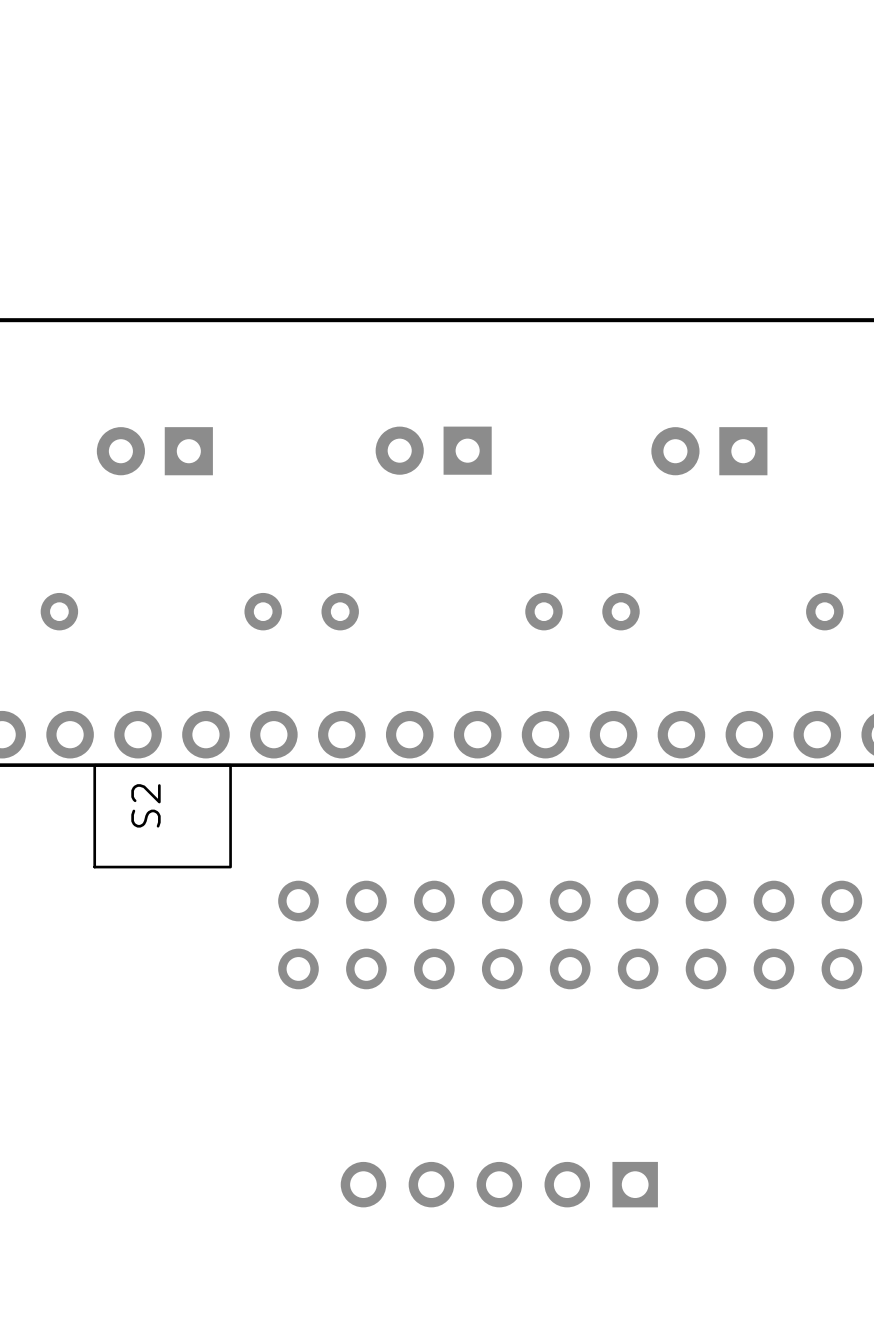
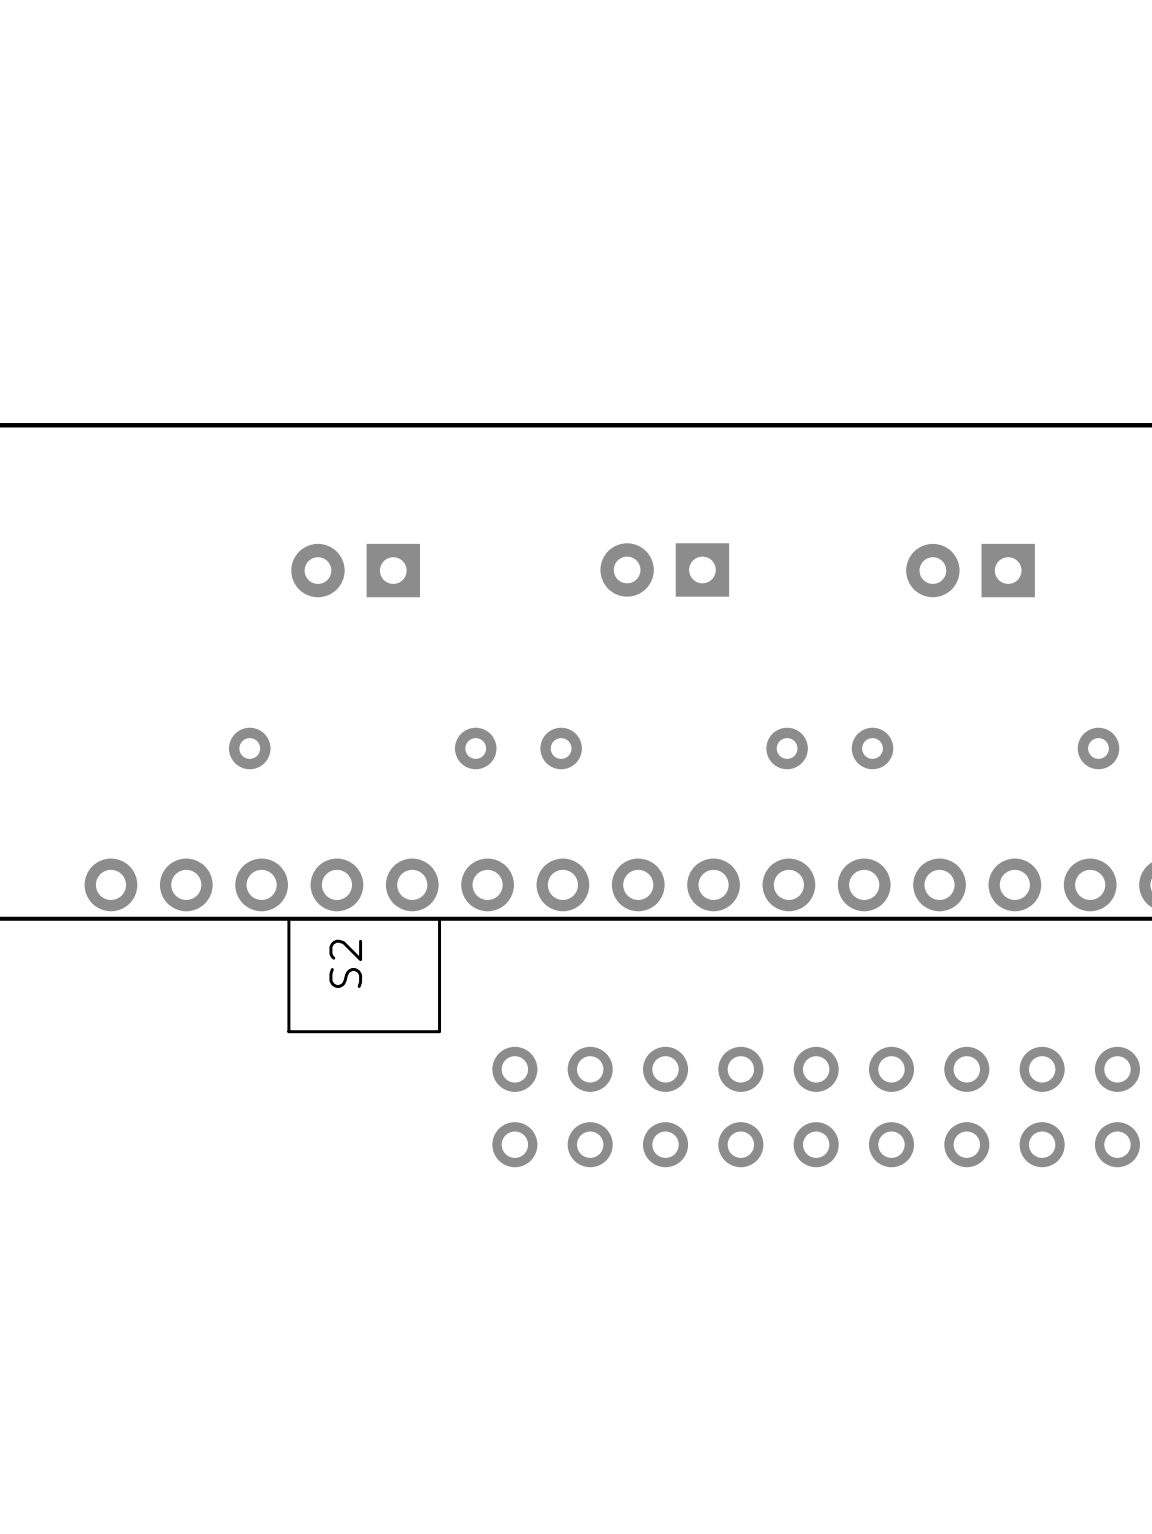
part: (499, 1184) -> none

